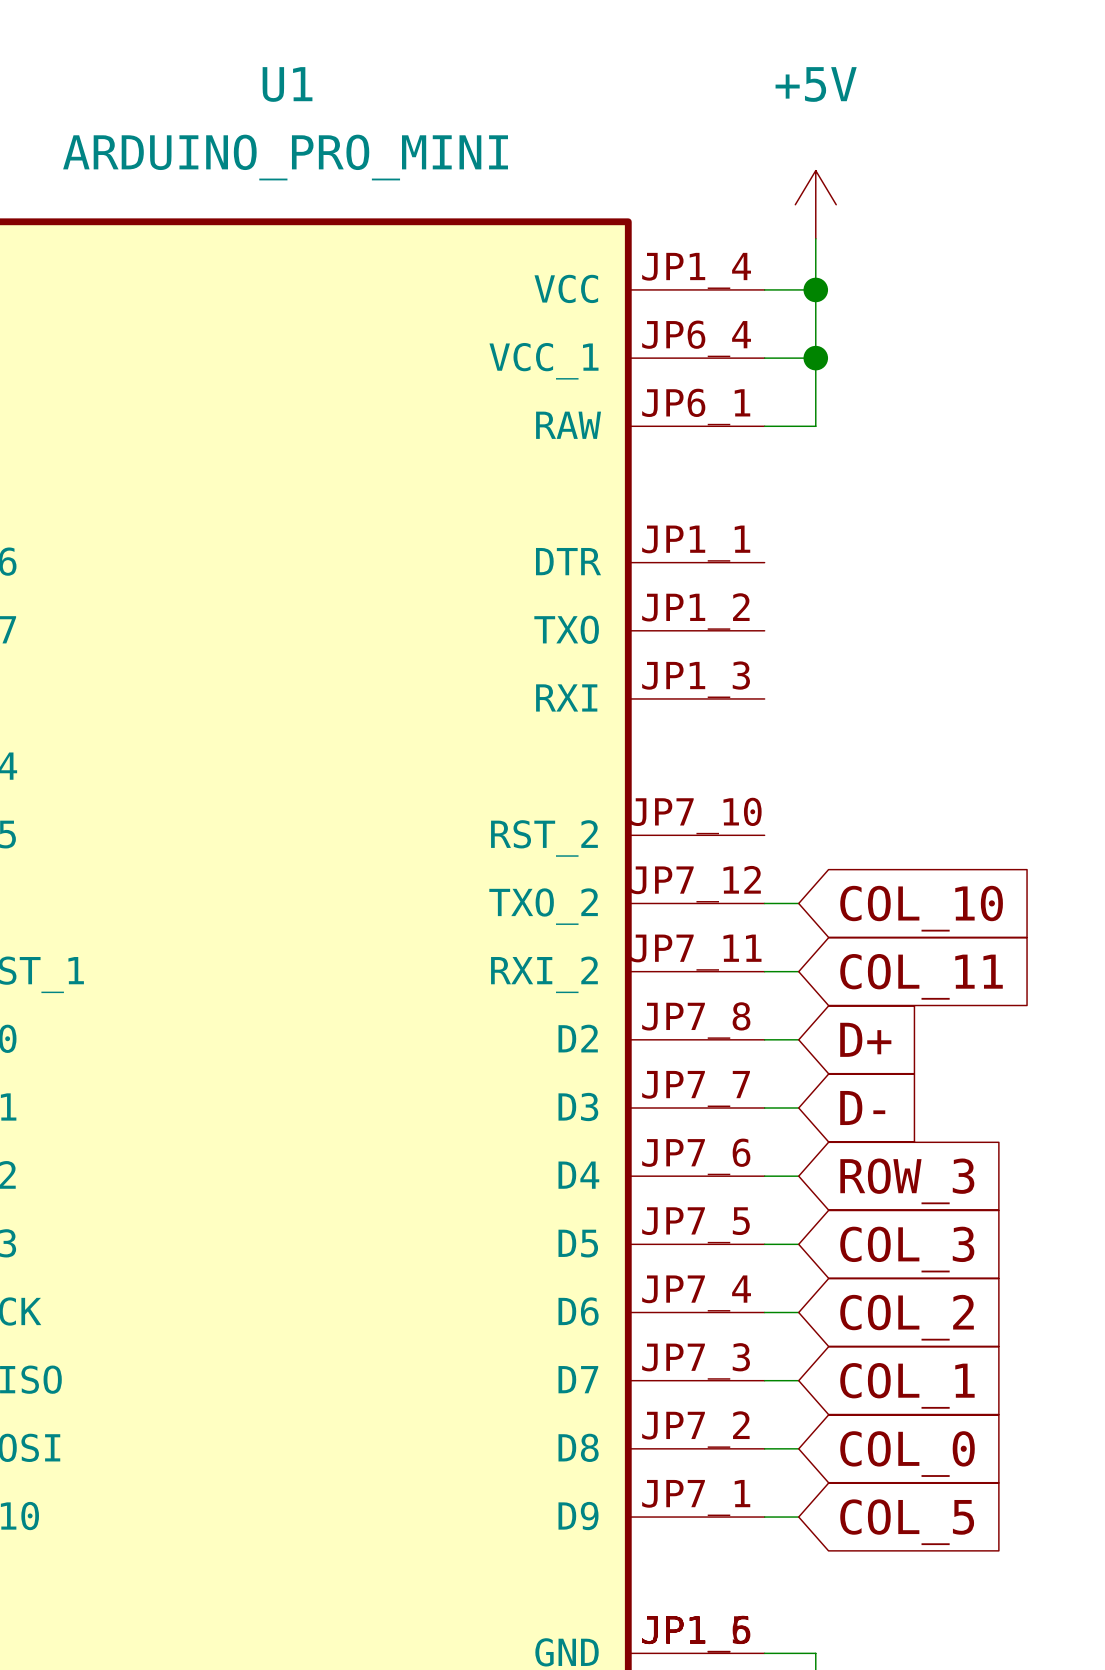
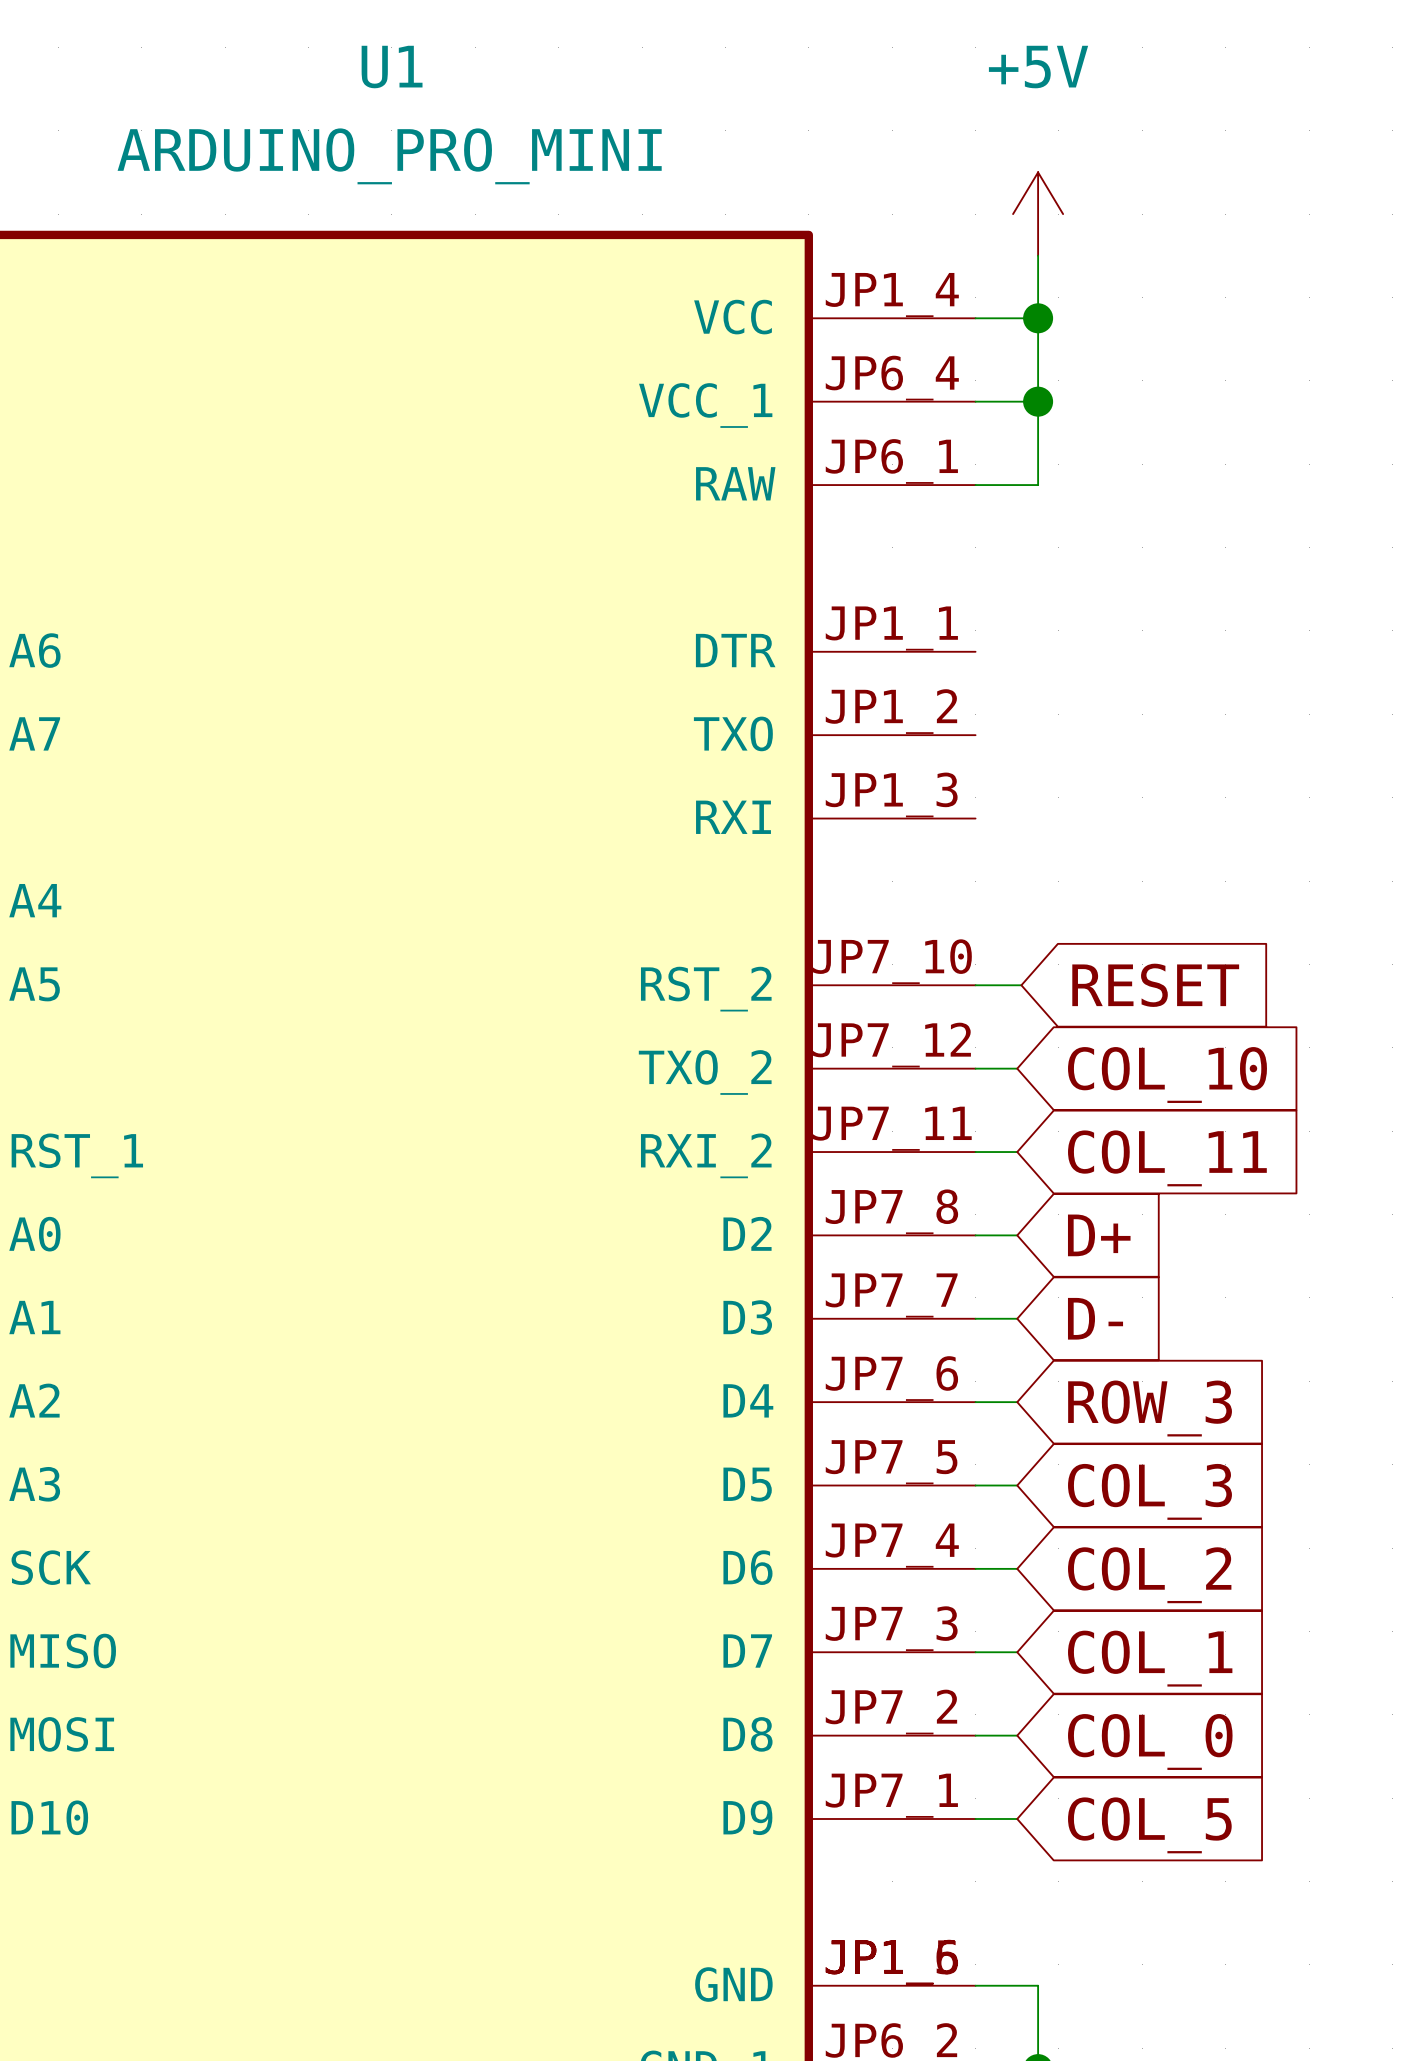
wire: none -> (975, 985) (1021, 985)
global label: none -> RESET (1155, 985)

